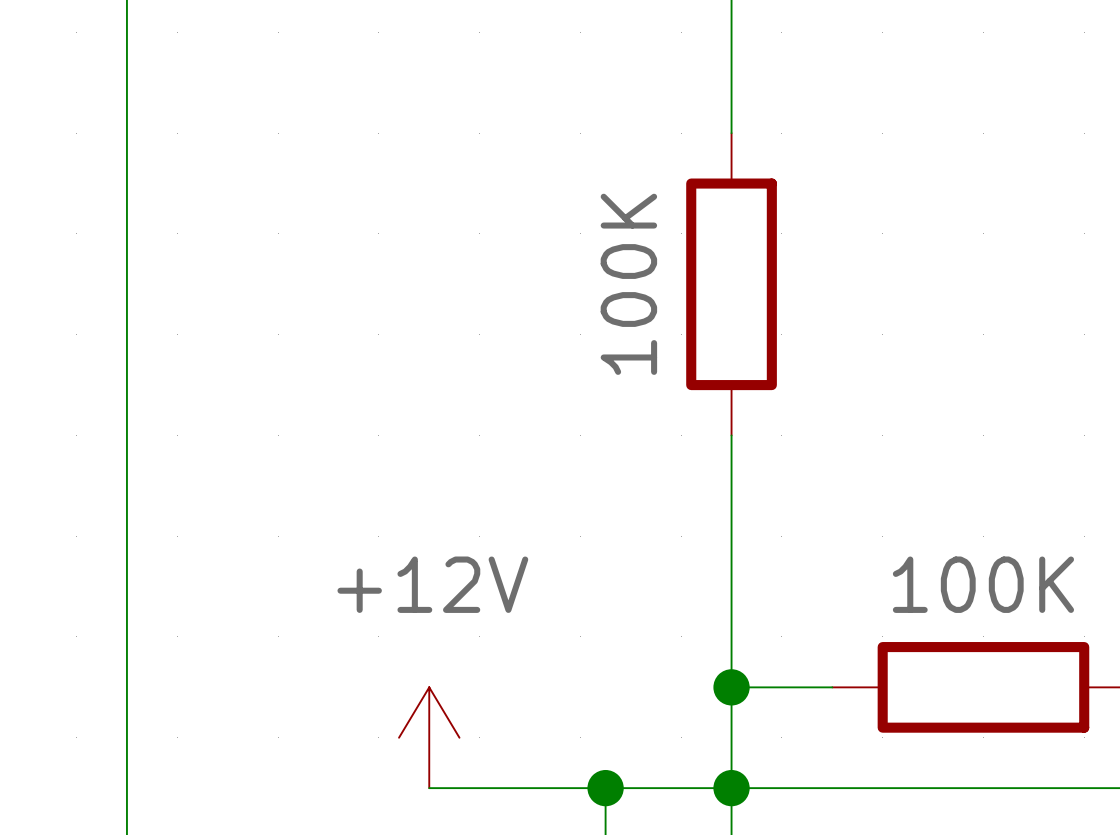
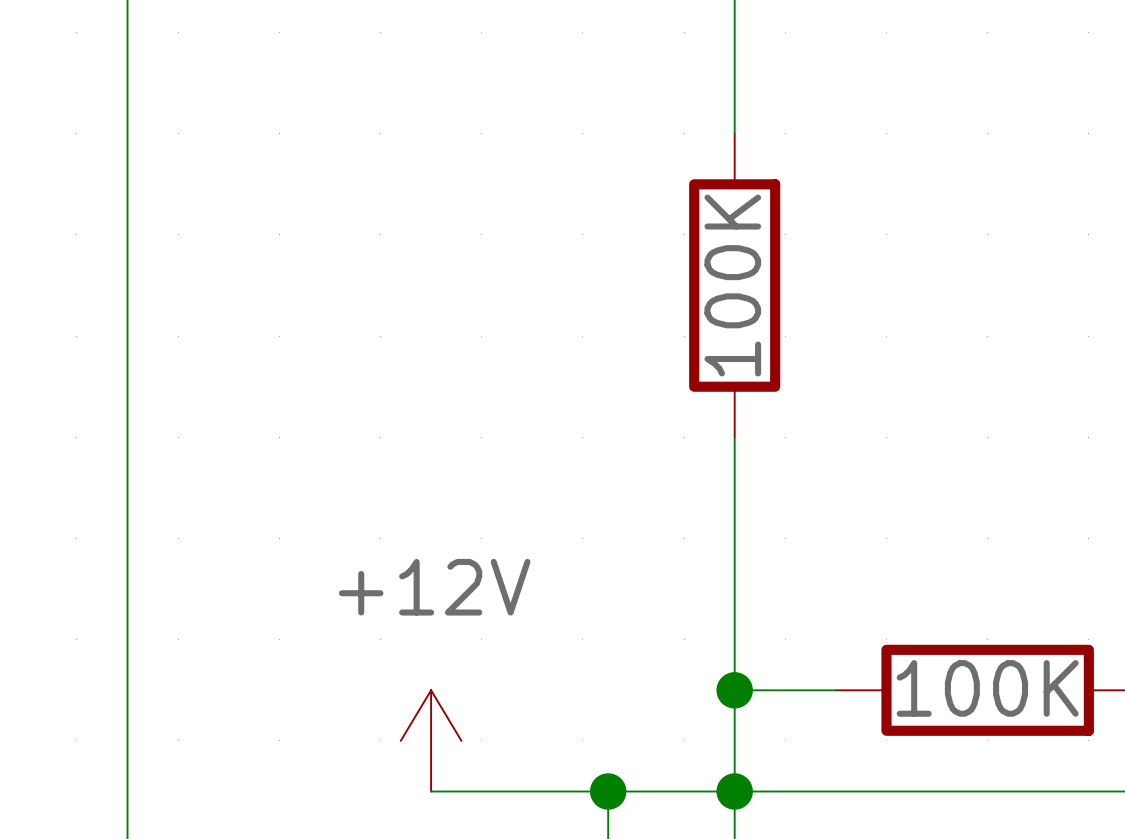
part value position: 100K (628, 284) -> 100K (732, 285)
part value position: 100K (983, 584) -> 100K (987, 688)

